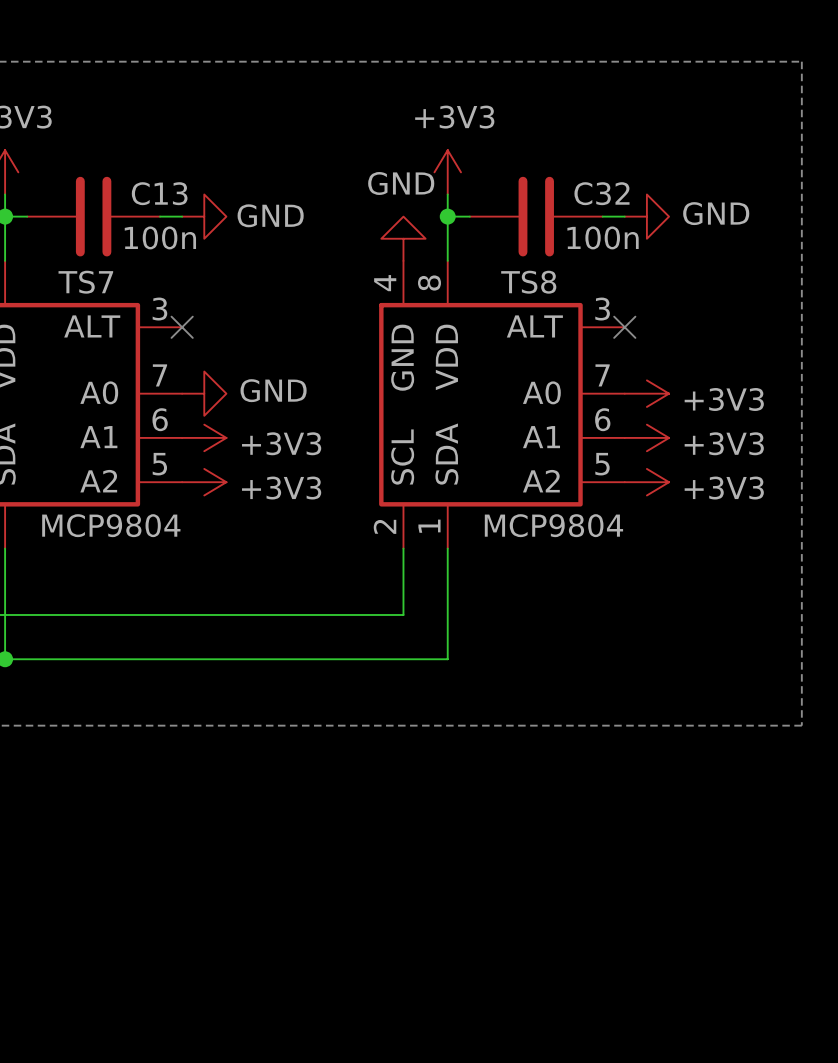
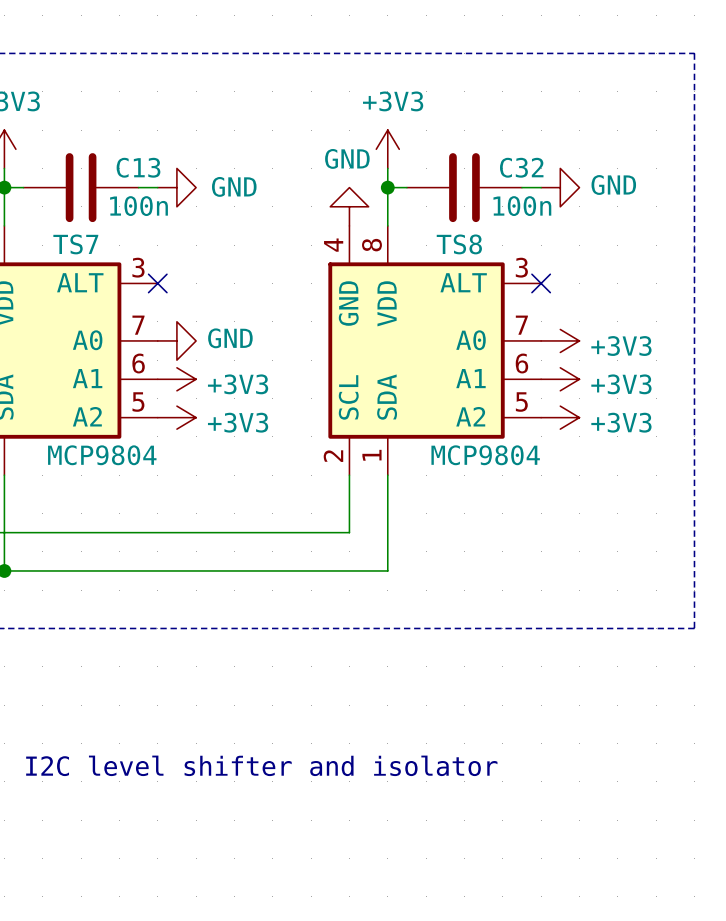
text: none -> I2C level shifter and isolator (261, 765)

